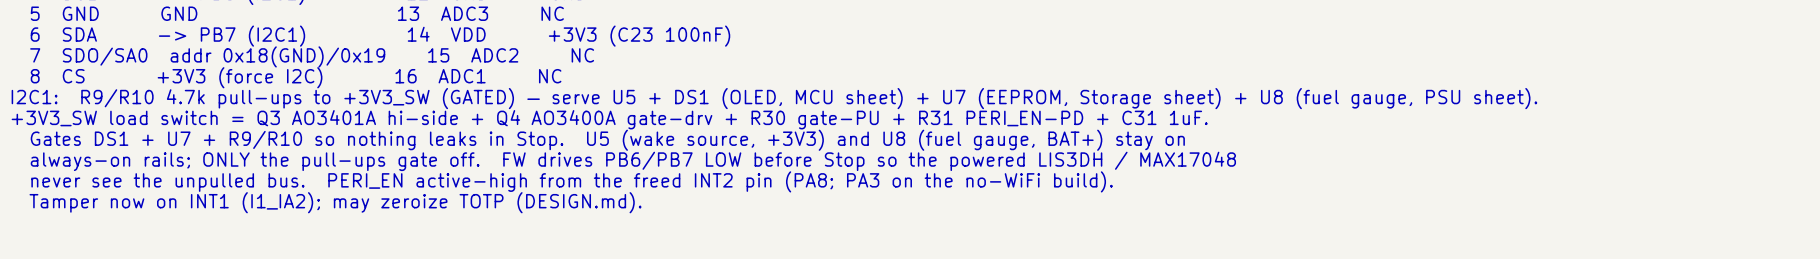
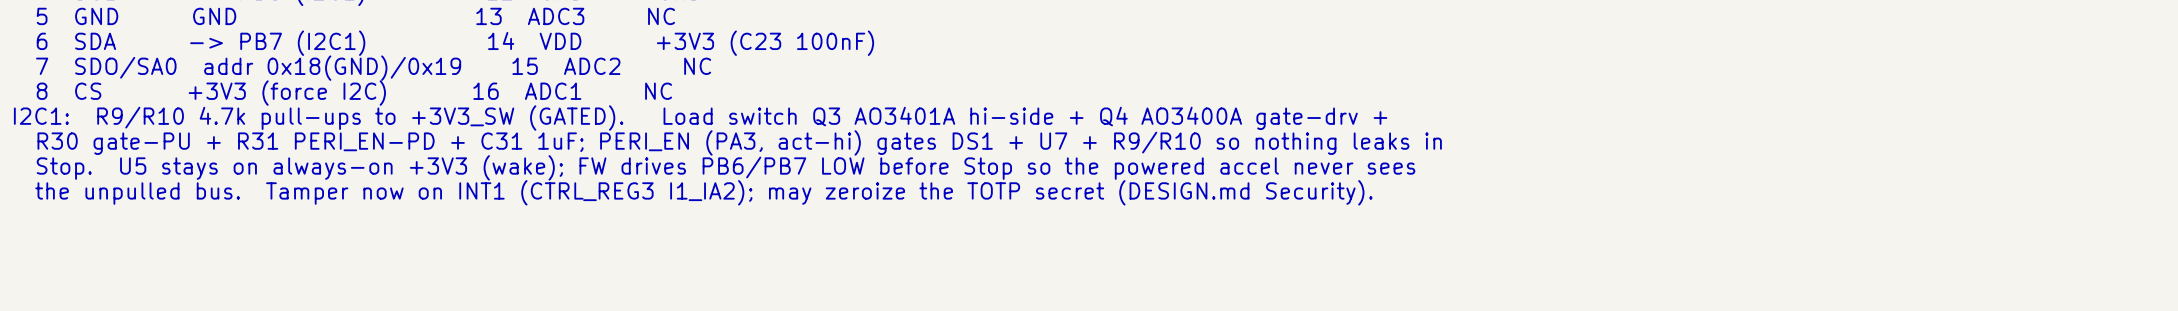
text: I2C1: R9/R10 4.7k pull-ups to +3V3_SW (GATED) — serve U5 + DS1 (OLED, MCU sheet) + U7 (EEPROM, Storage sheet) + U8 (fuel gauge, PSU sheet). (774, 98) -> I2C1: R9/R10 4.7k pull-ups to +3V3_SW (GATED). Load switch Q3 AO3401A hi-side + Q4 AO3400A gate-drv + (700, 118)
text: +3V3_SW load switch = Q3 AO3401A hi-side + Q4 AO3400A gate-drv + R30 gate-PU + R31 PERI_EN-PD + C31 1uF. (609, 119) -> R30 gate-PU + R31 PERI_EN-PD + C31 1uF; PERI_EN (PA3, act-hi) gates DS1 + U7 + R9/R10 so nothing leaks in (739, 142)
text: Gates DS1 + U7 + R9/R10 so nothing leaks in Stop. U5 (wake source, +3V3) and U8 (fuel gauge, BAT+) stay on (607, 140) -> Stop. U5 stays on always-on +3V3 (wake); FW drives PB6/PB7 LOW before Stop so the powered accel never sees (726, 167)
text: always-on rails; ONLY the pull-ups gate off. FW drives PB6/PB7 LOW before Stop so the powered LIS3DH / MAX17048 (633, 161) -> the unpulled bus. Tamper now on INT1 (CTRL_REG3 I1_IA2); may zeroize the TOTP secret (DESIGN.md Security). (703, 192)
text: never see the unpulled bus. PERI_EN active-high from the freed INT2 pin (PA8; PA3 on the no-WiFi build). (572, 181) -> none
text: Tamper now on INT1 (I1_IA2); may zeroize TOTP (DESIGN.md). (335, 202) -> none

